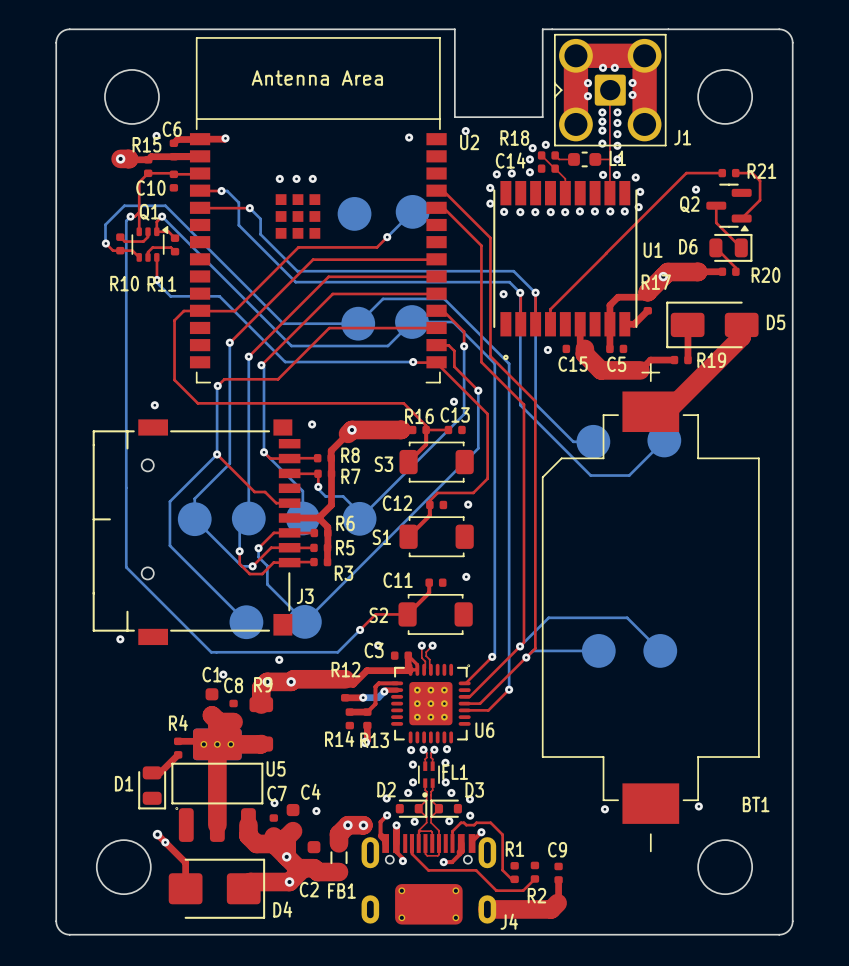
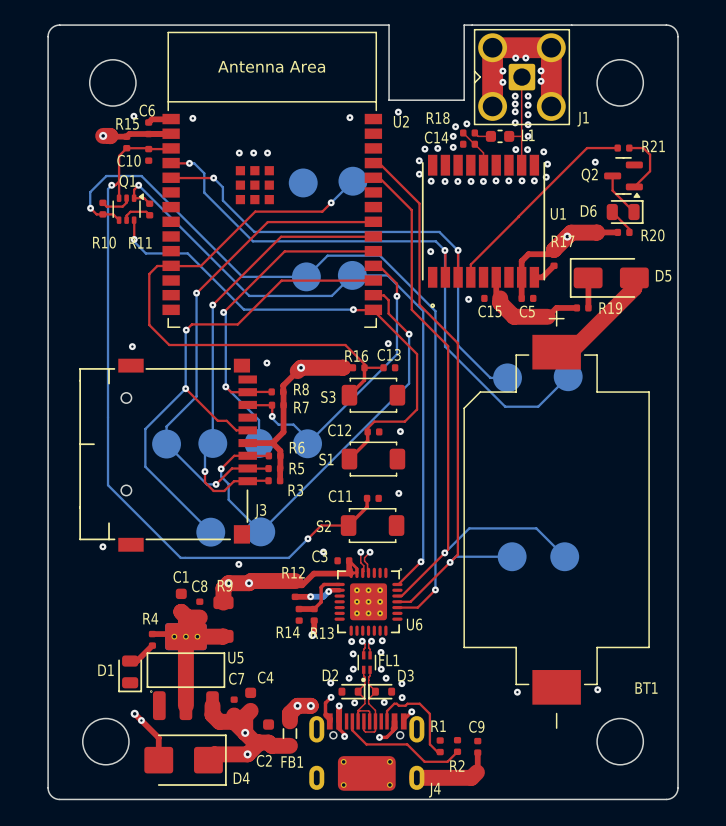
top track: (225, 138) (200, 139) -> none
via: (223, 674) -> none
via: (274, 803) -> none
via: (316, 811) -> none

